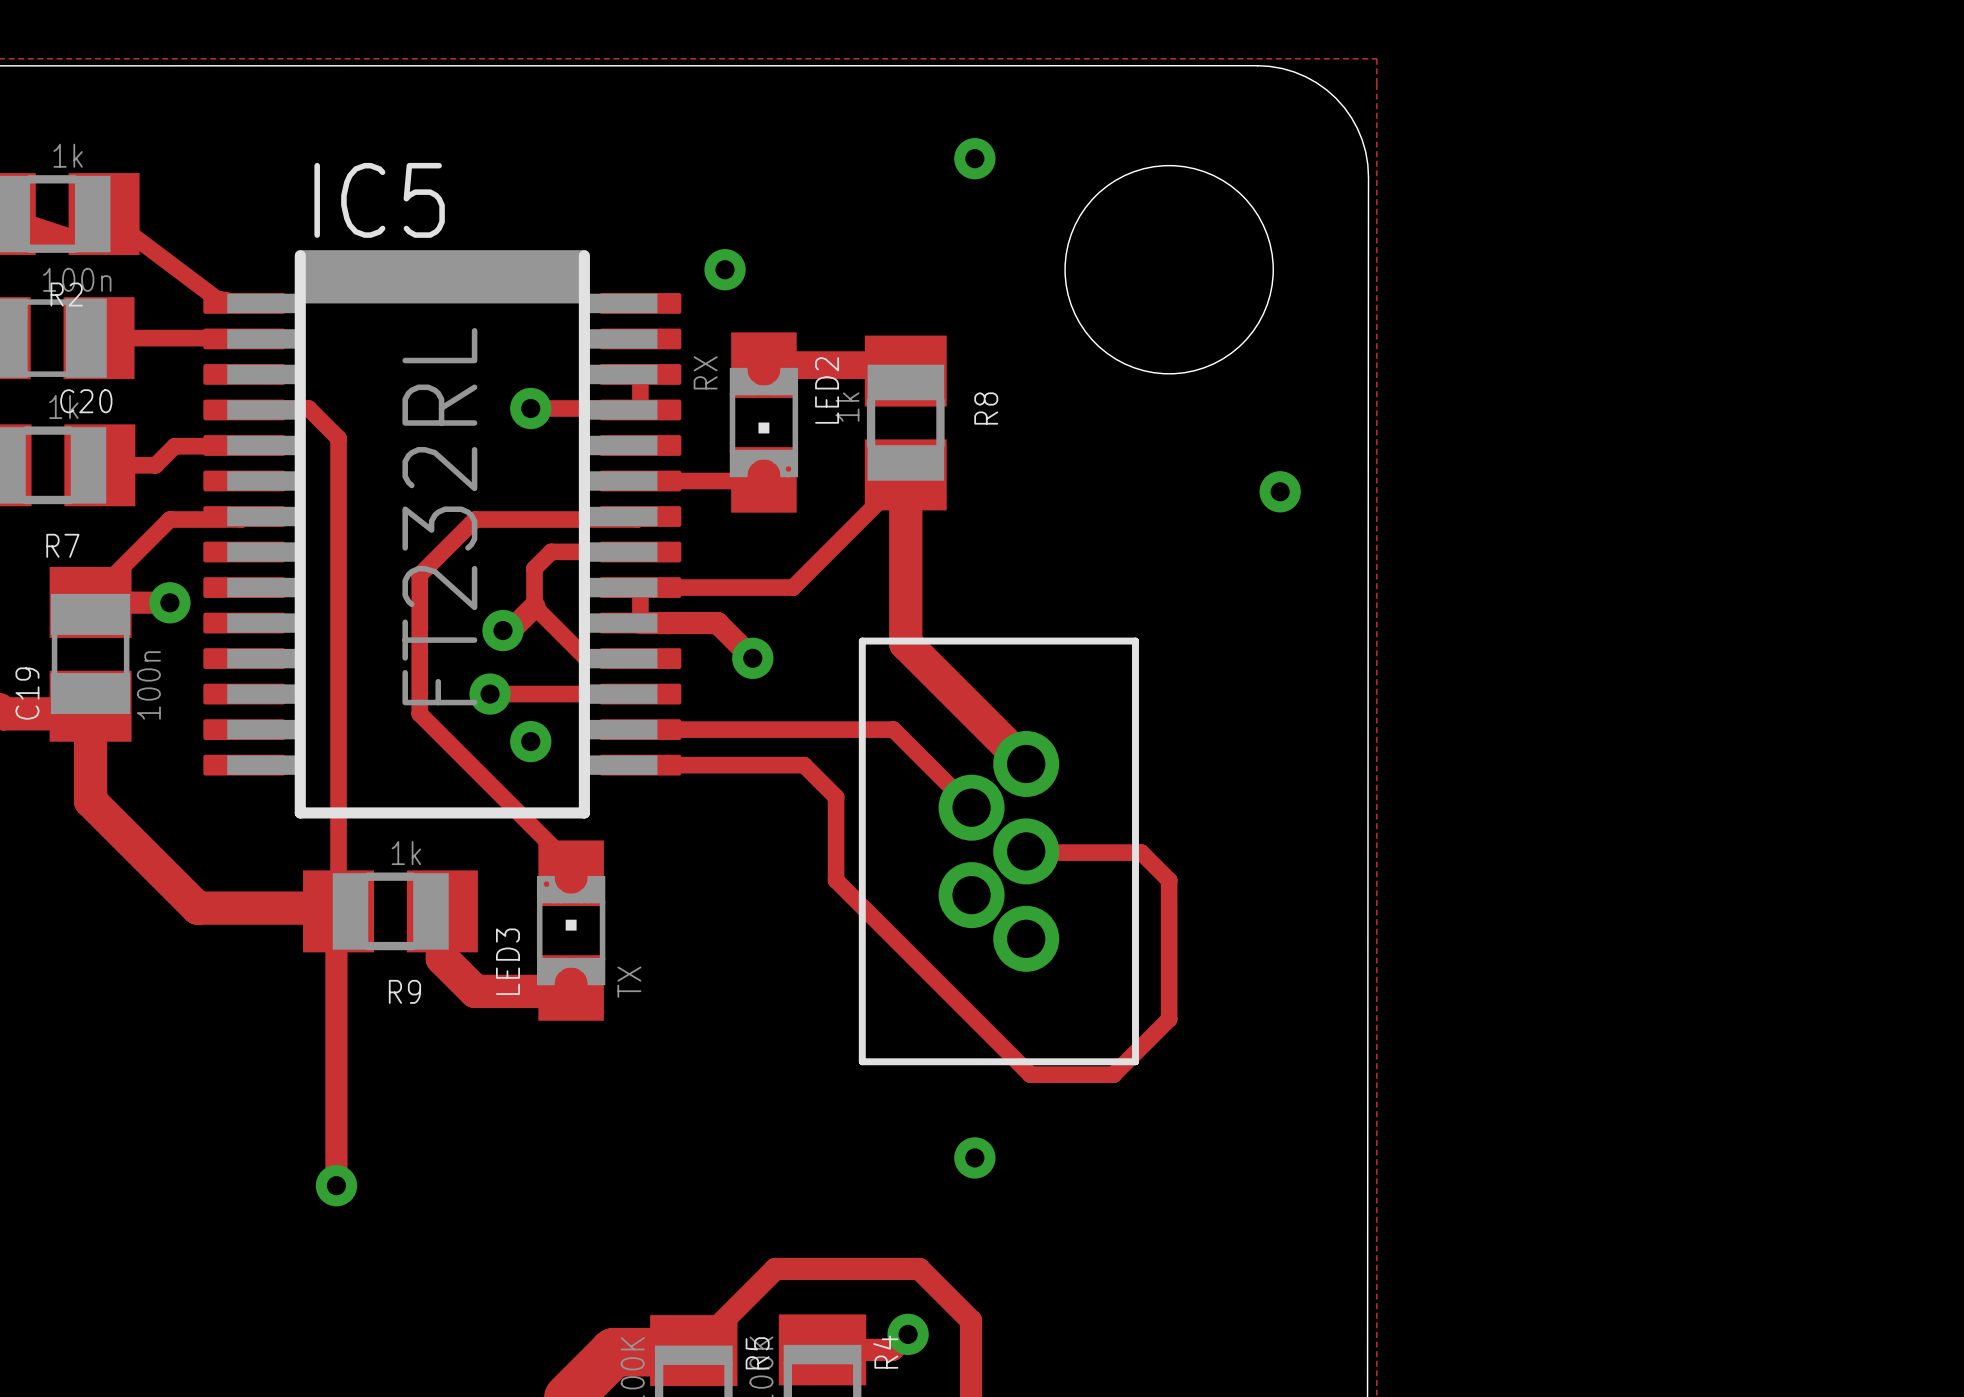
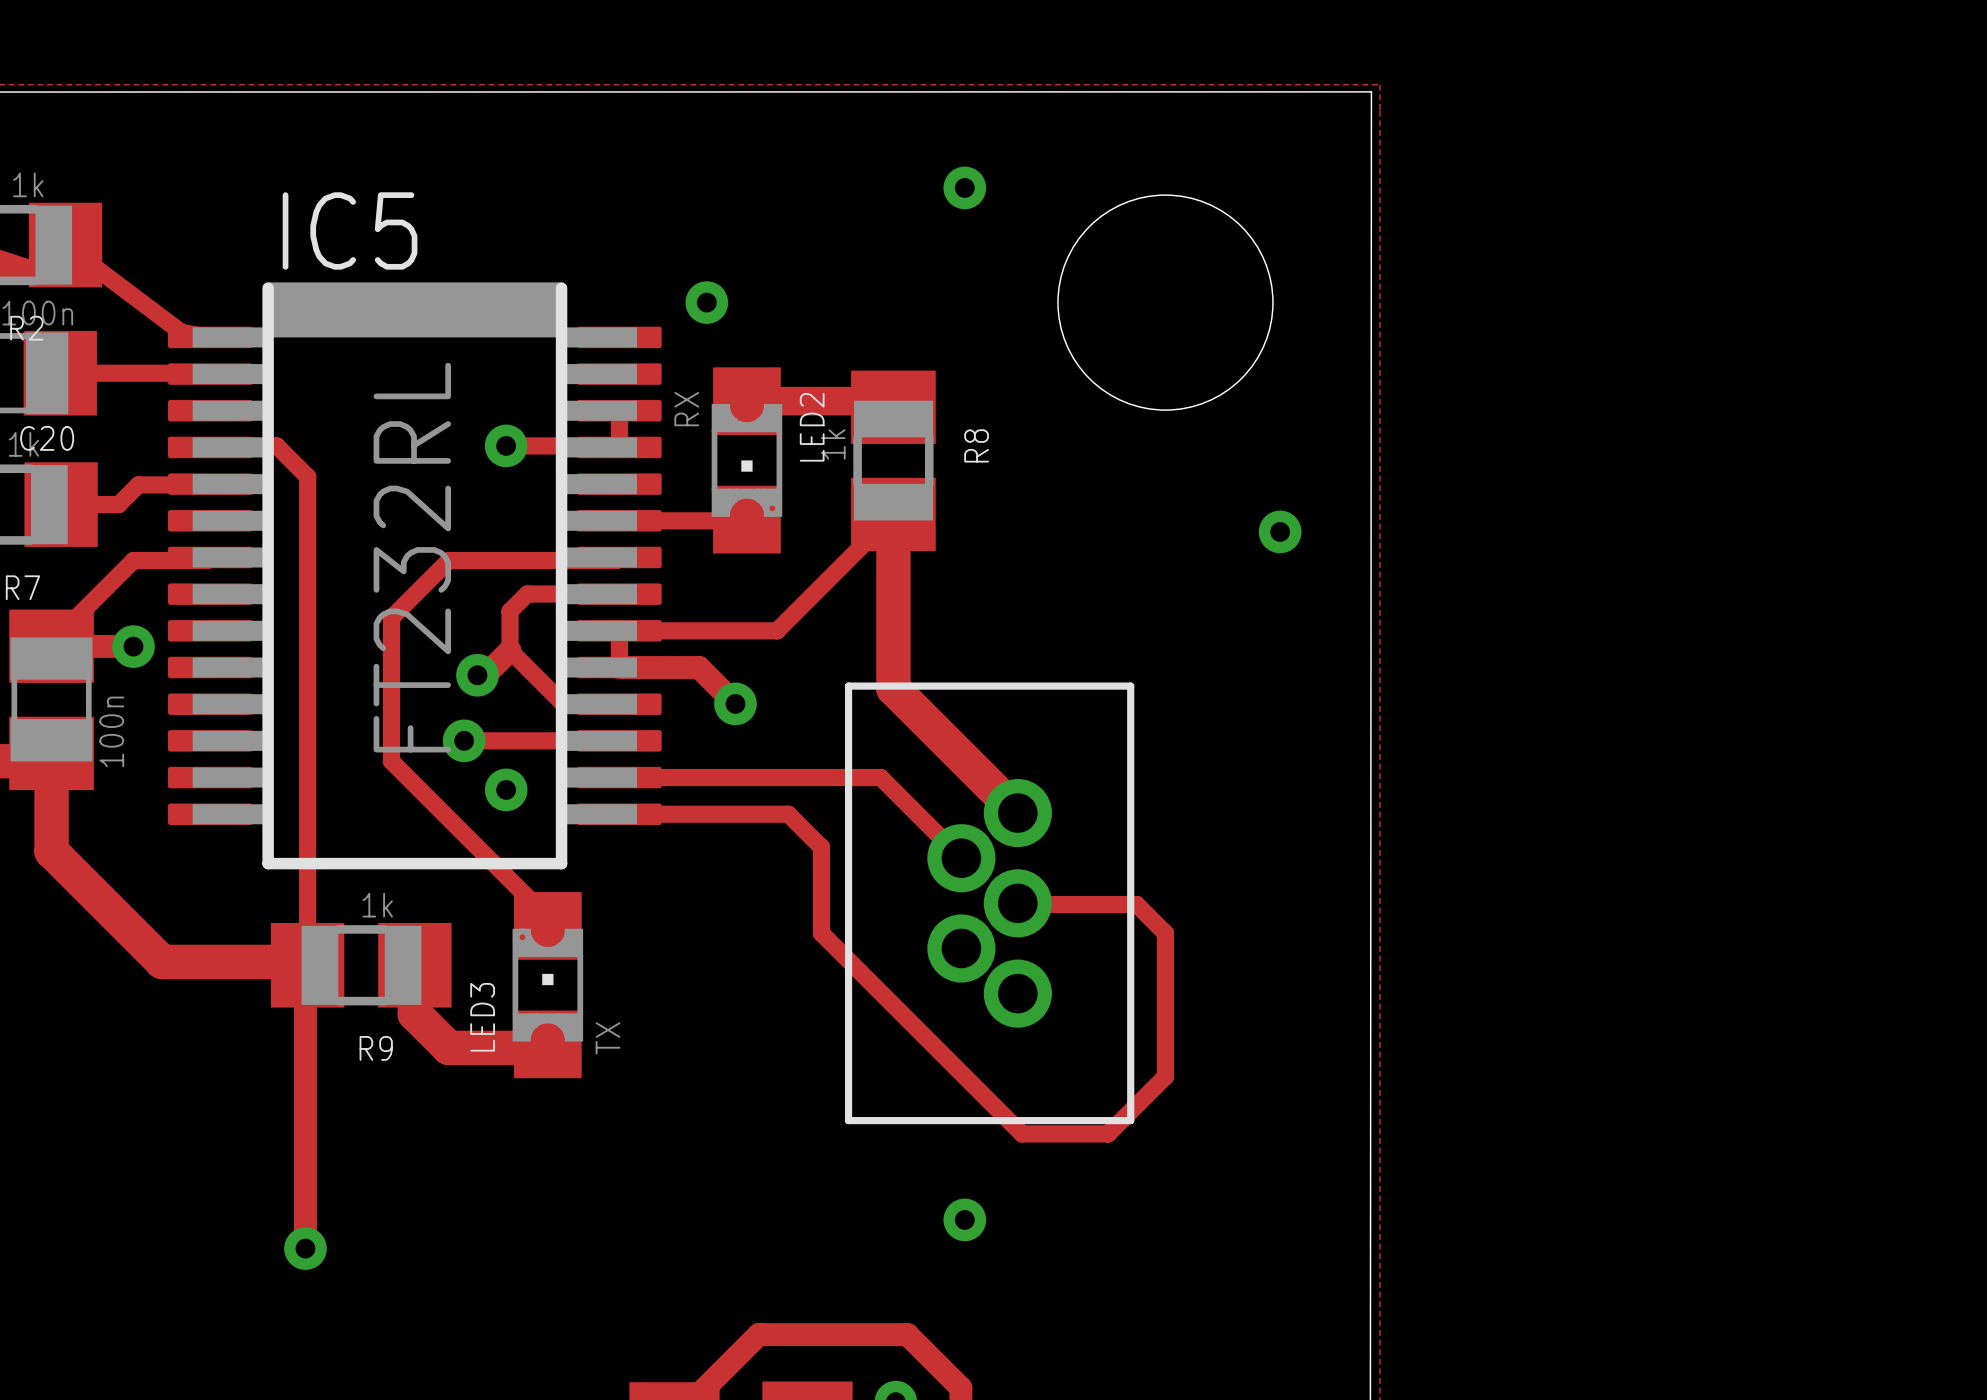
board edge: (1257, 65) (1282, 68) (1305, 76) (1336, 98) (1351, 117) (1362, 140) (1368, 176) -> (1256, 91) (1371, 91) (1371, 206)

